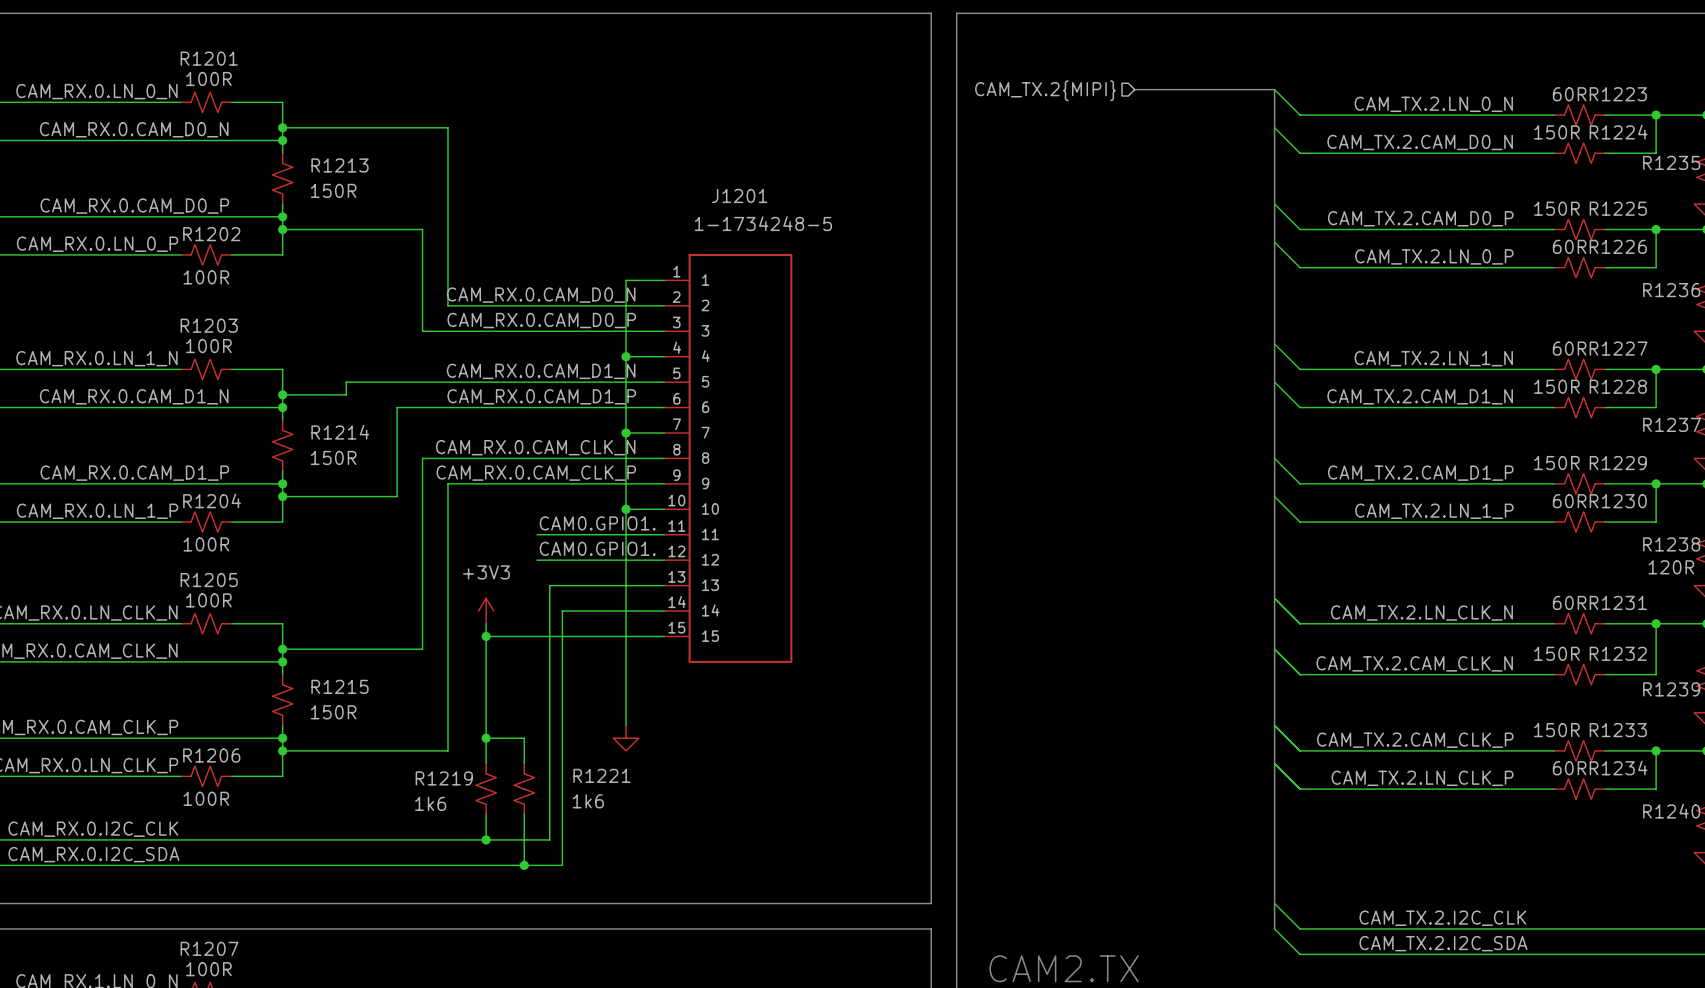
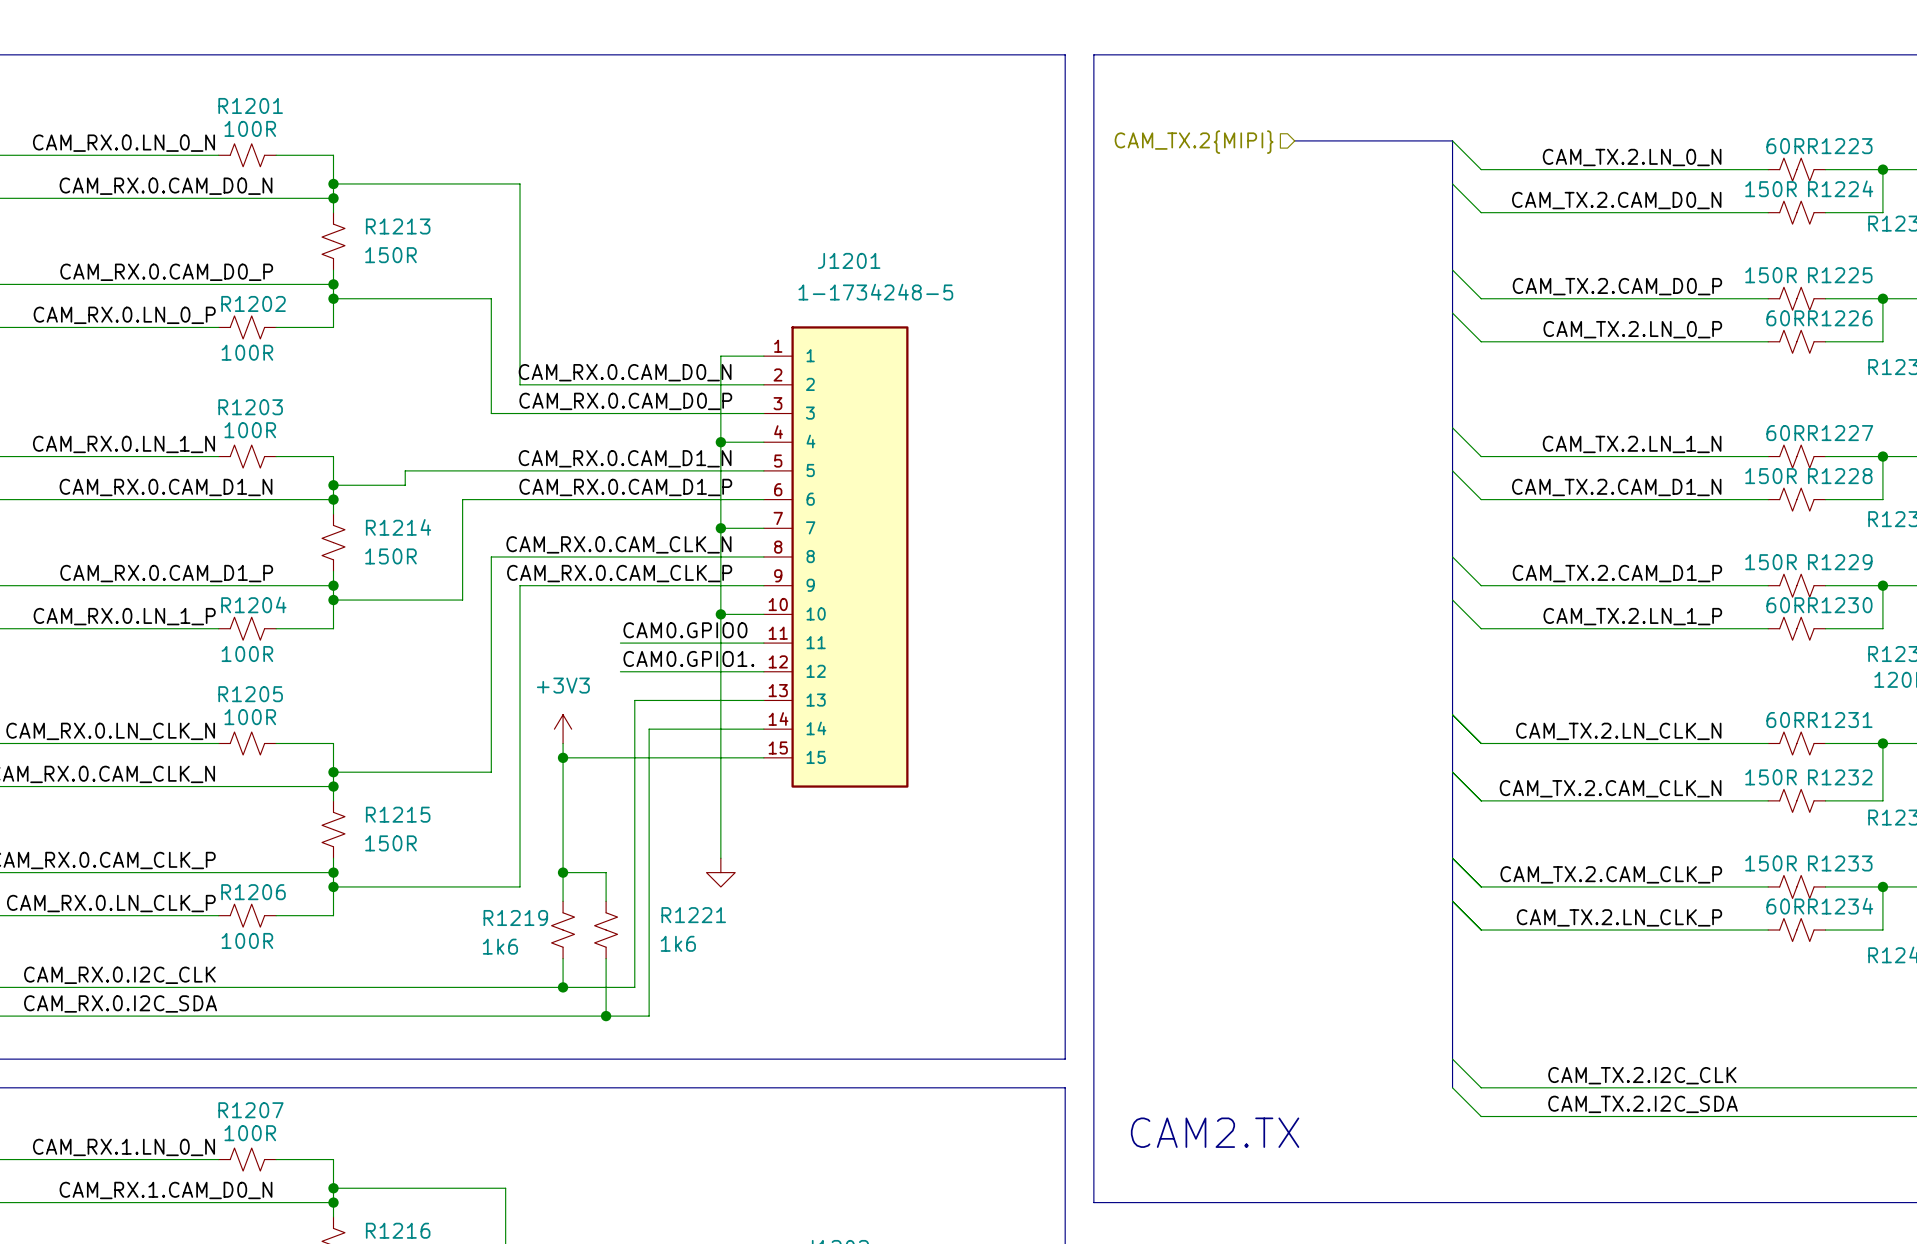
label: CAM0.GPIO1. (597, 523) -> CAM0.GPIO0 (685, 630)

